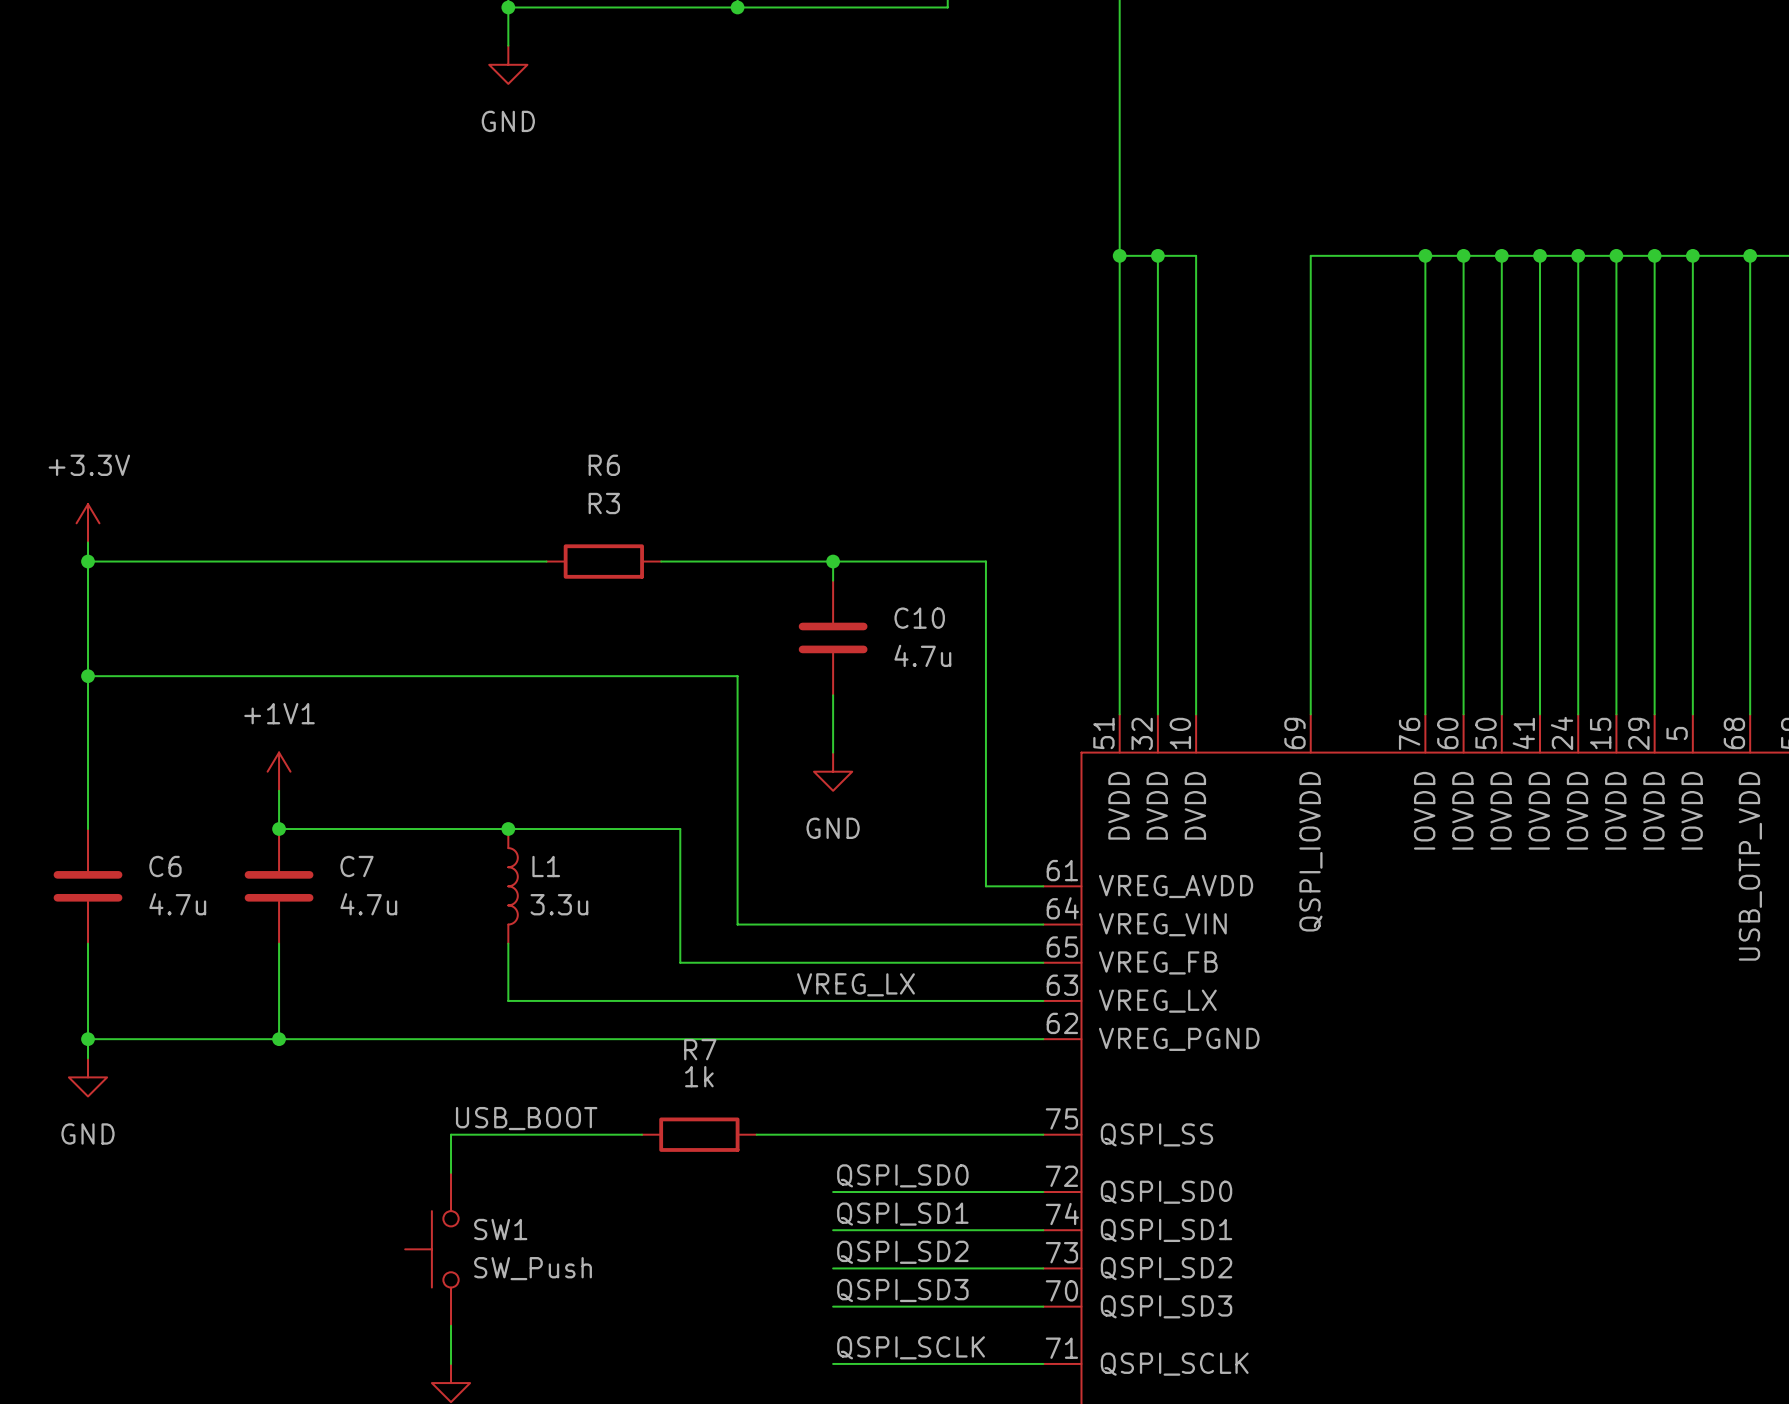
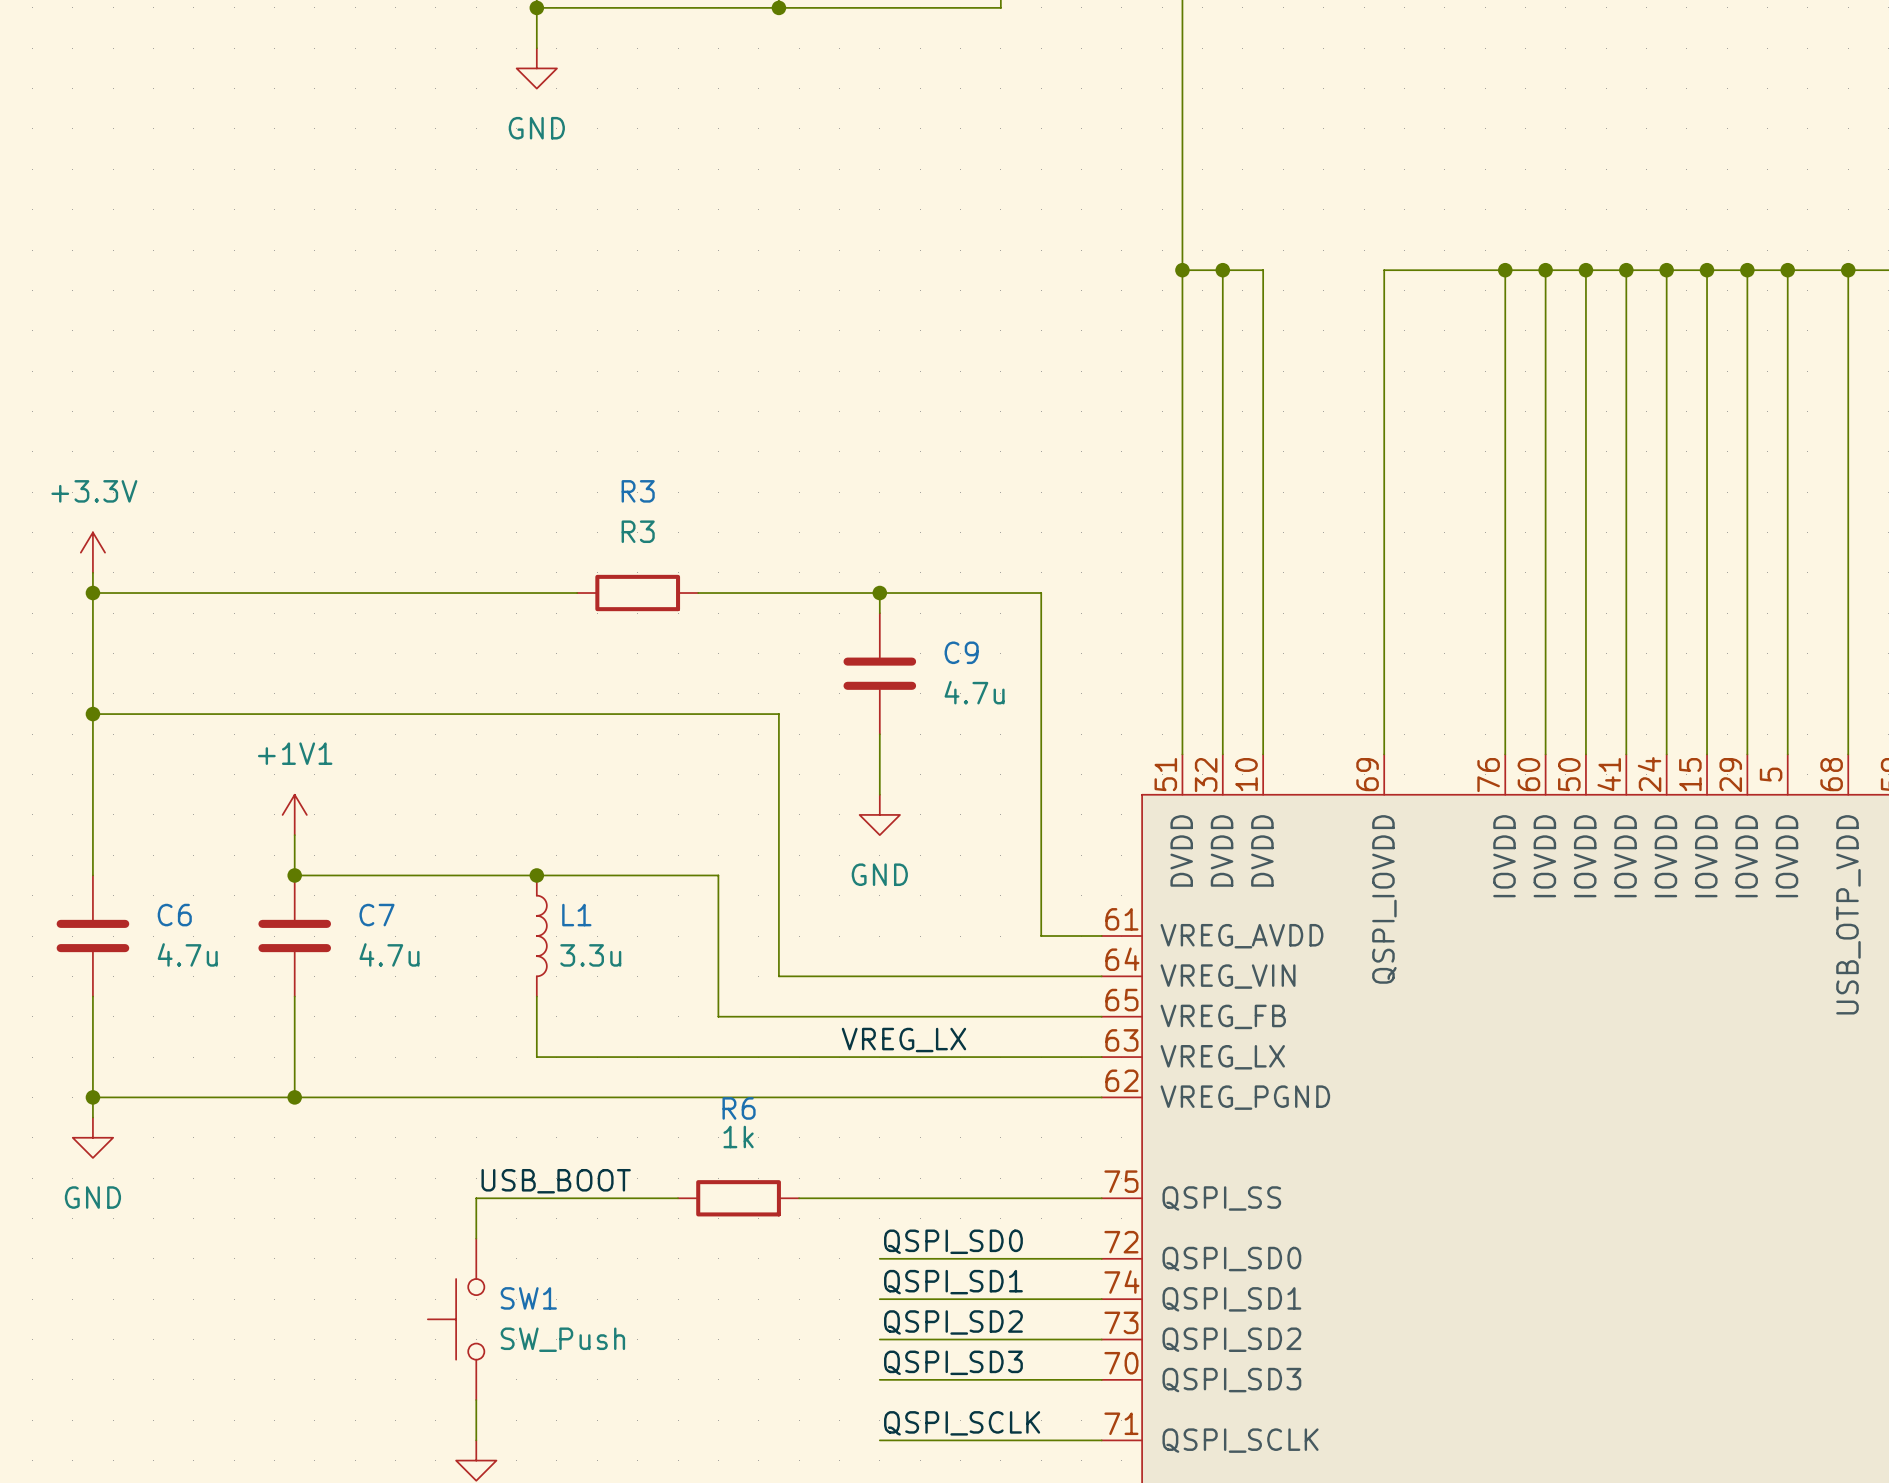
R6 name: R6 (604, 465) -> R3 (638, 491)
C10 name: C10 (919, 618) -> C9 (961, 652)
R7 name: R7 (700, 1049) -> R6 (739, 1108)

